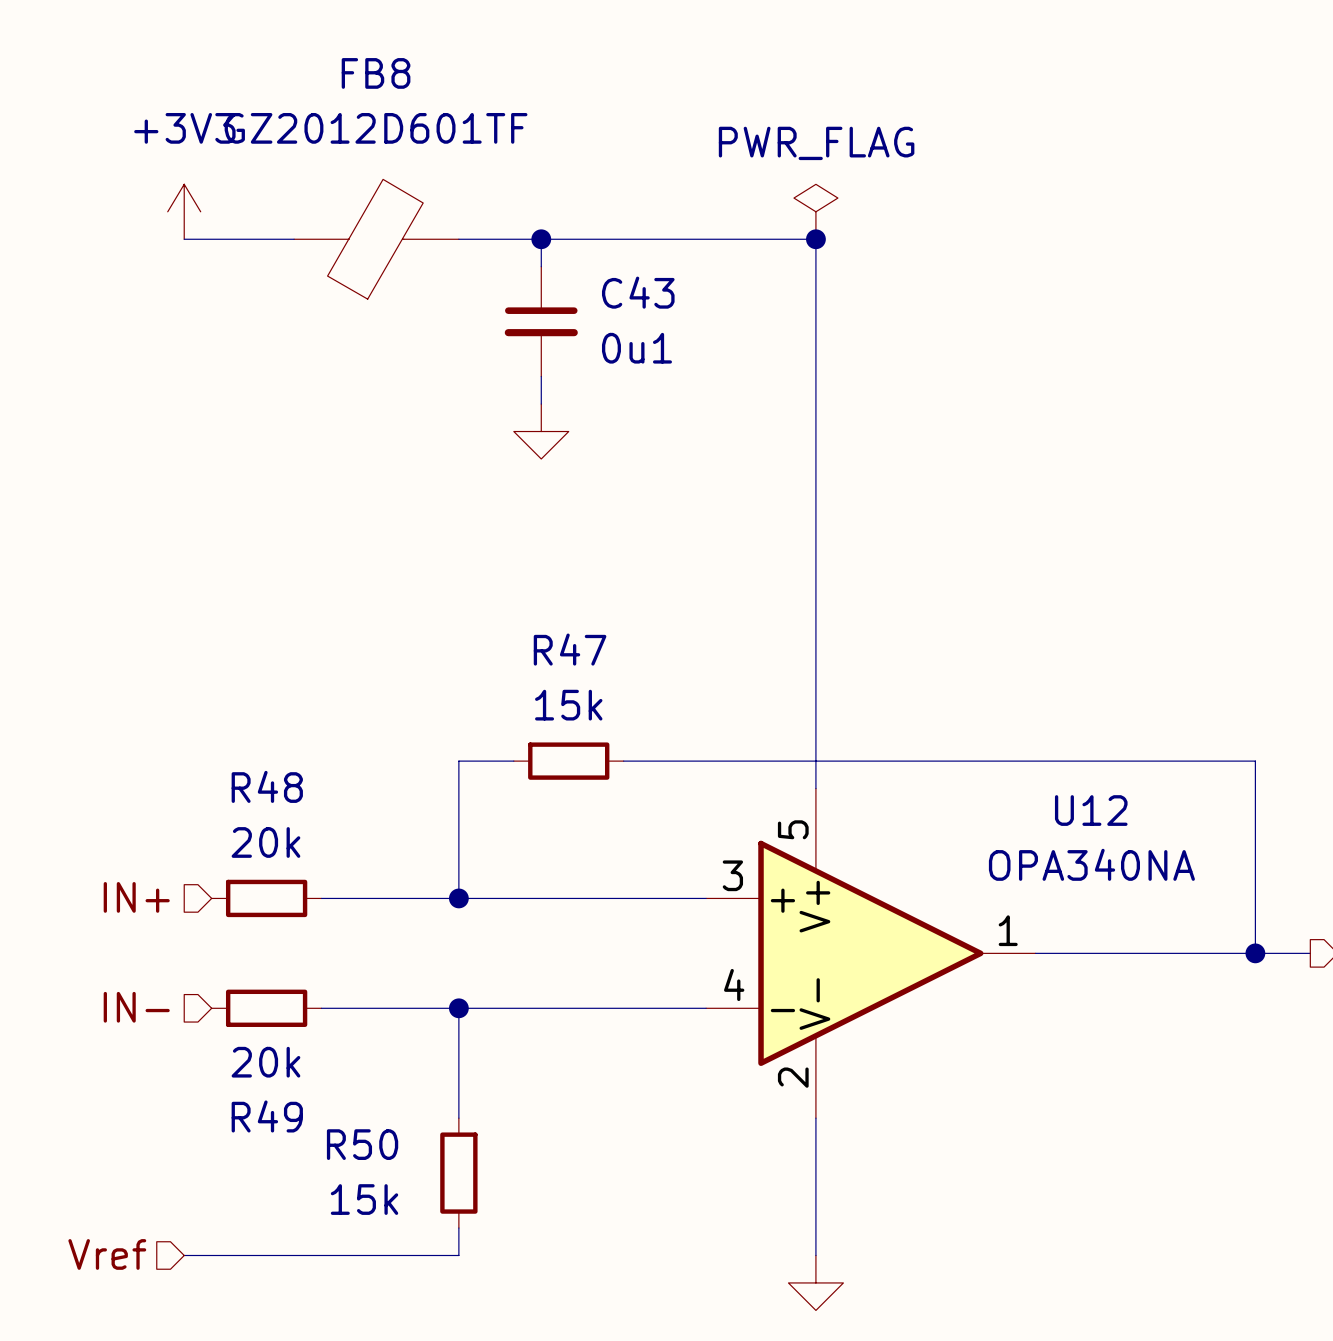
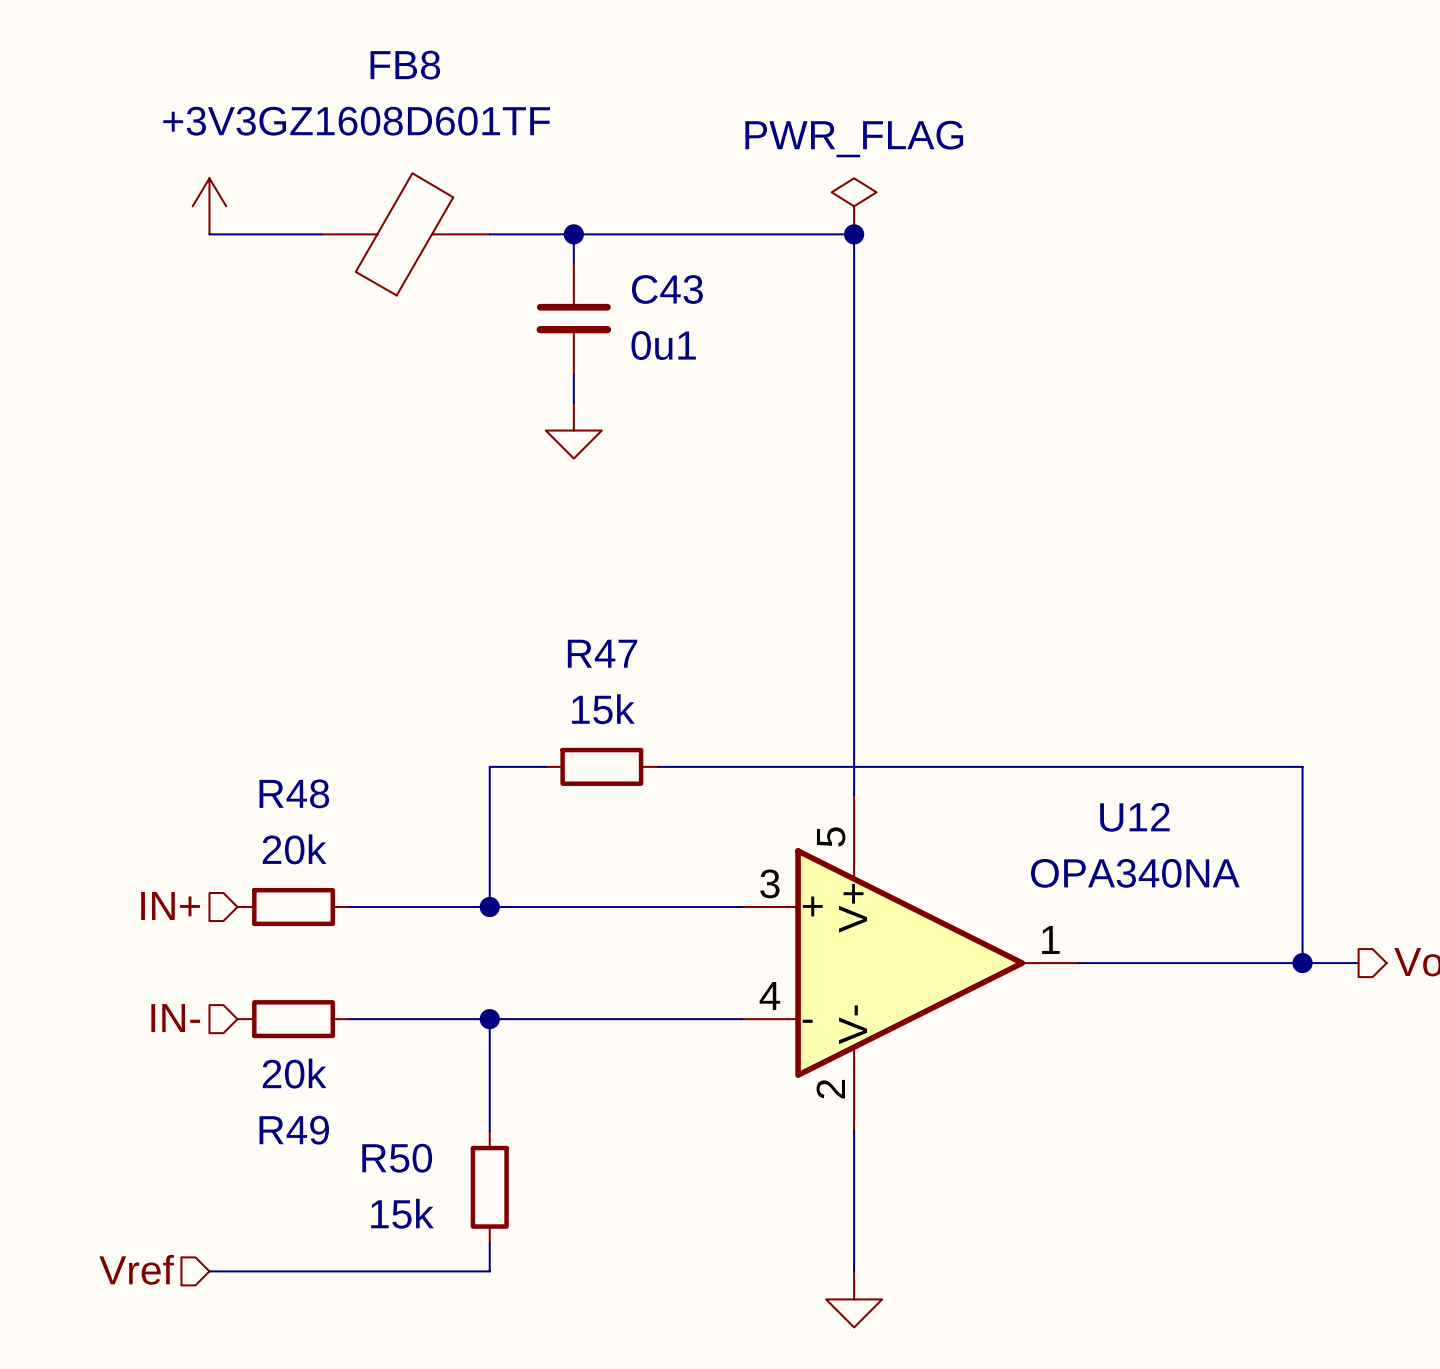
FB8 value: GZ2012D601TF (376, 128) -> GZ1608D601TF (404, 121)

